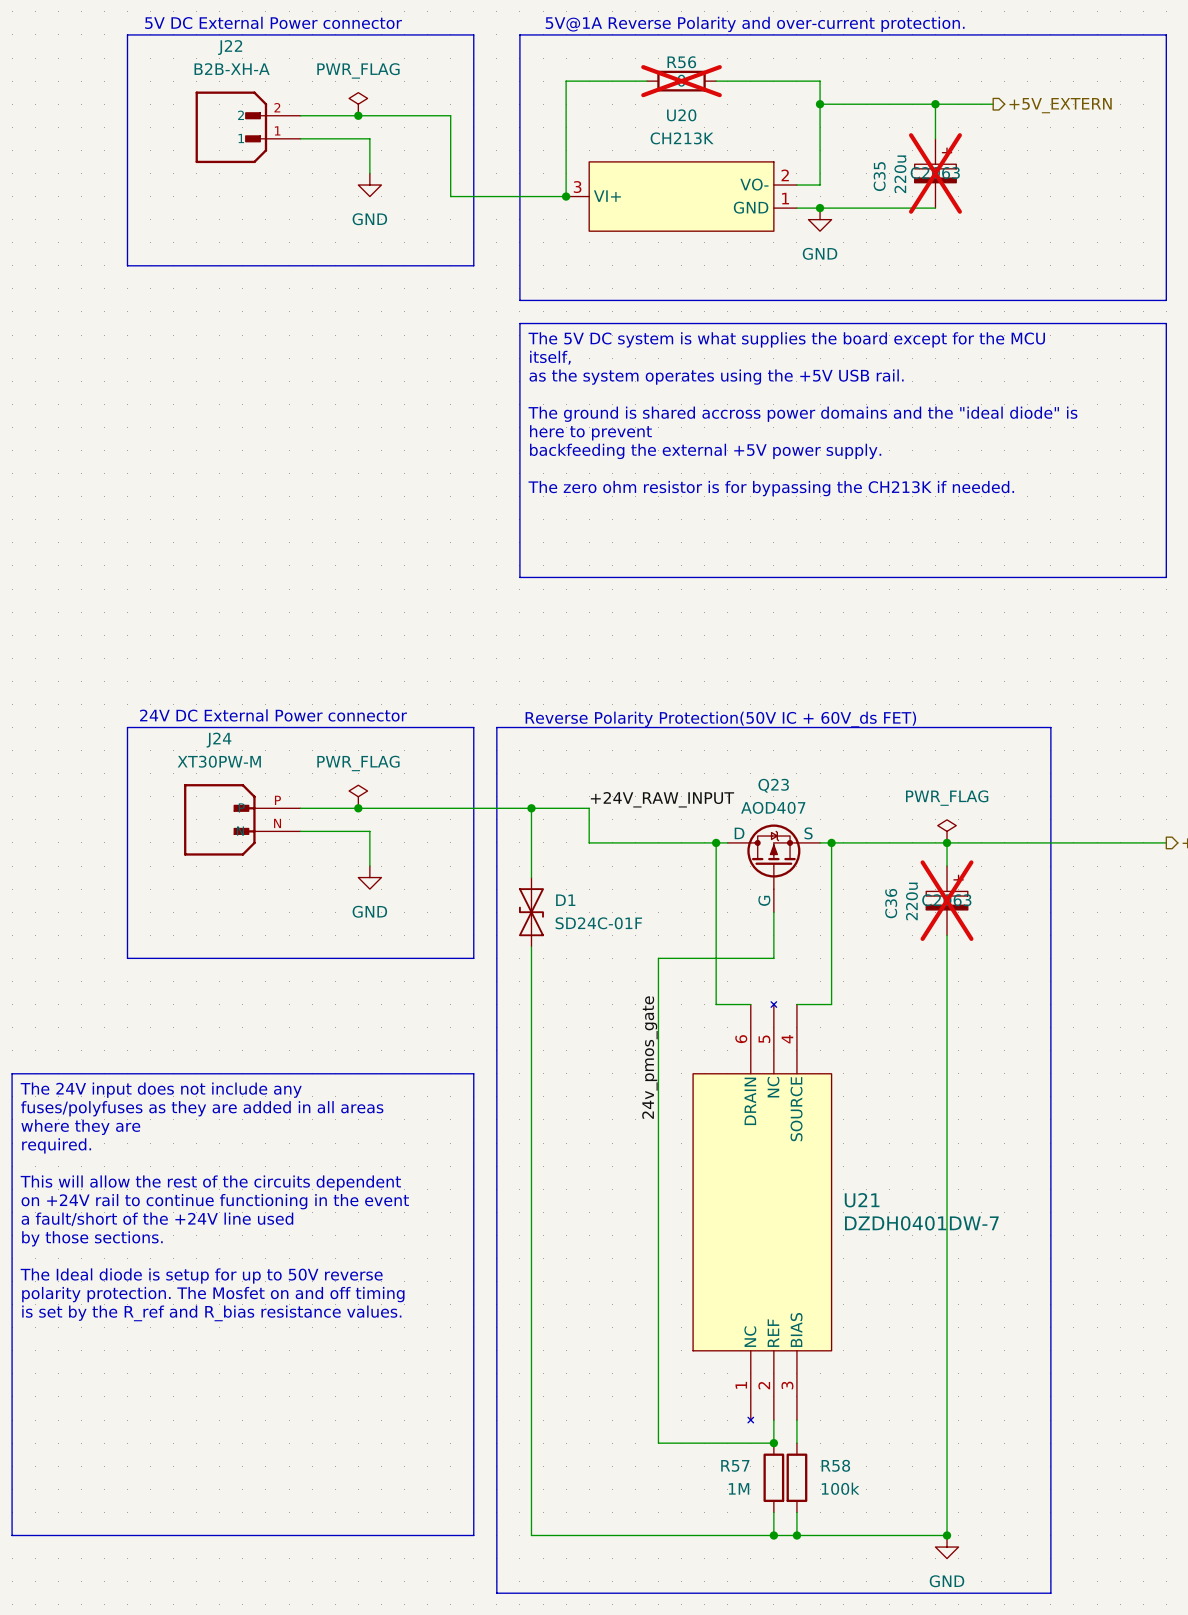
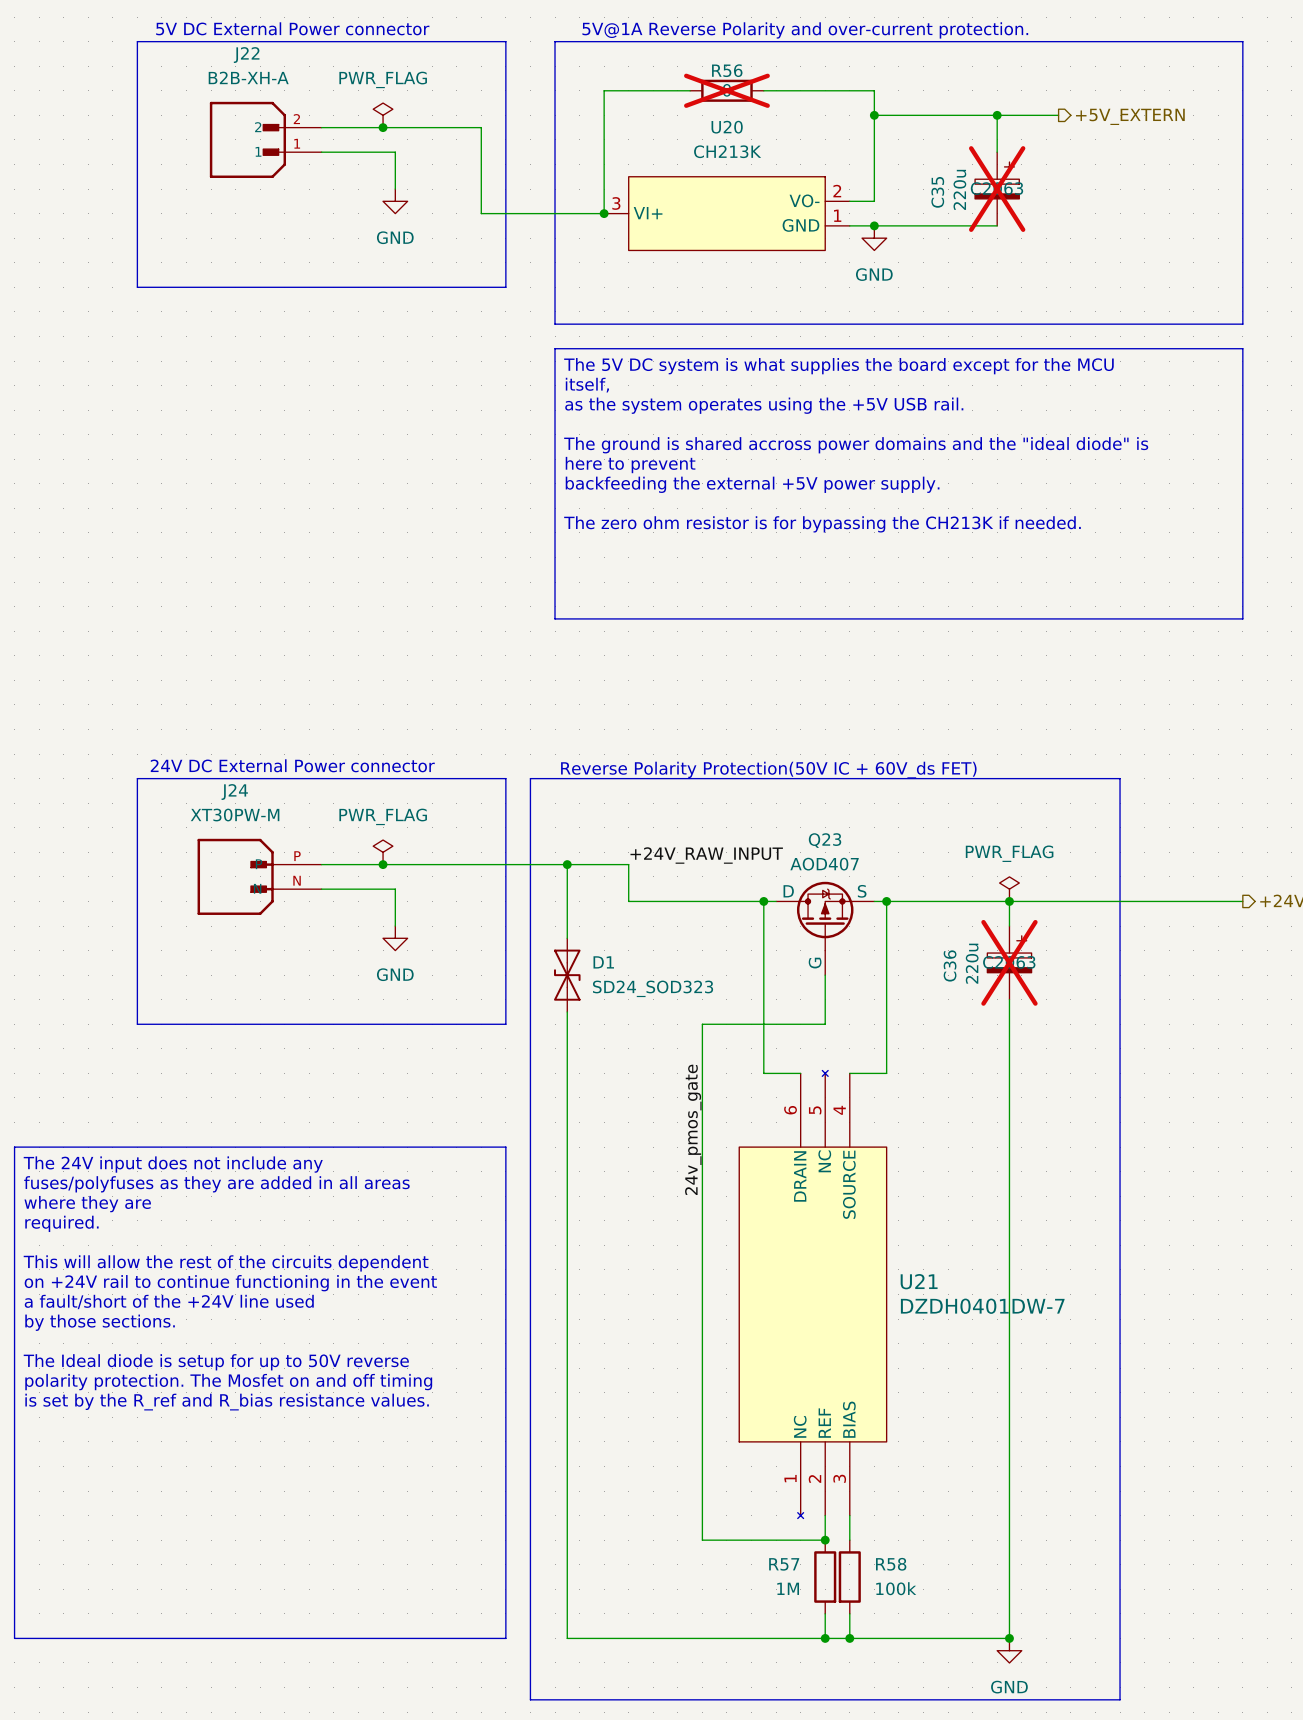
D1 value: SD24C-01F (598, 923) -> SD24_SOD323 (653, 988)

